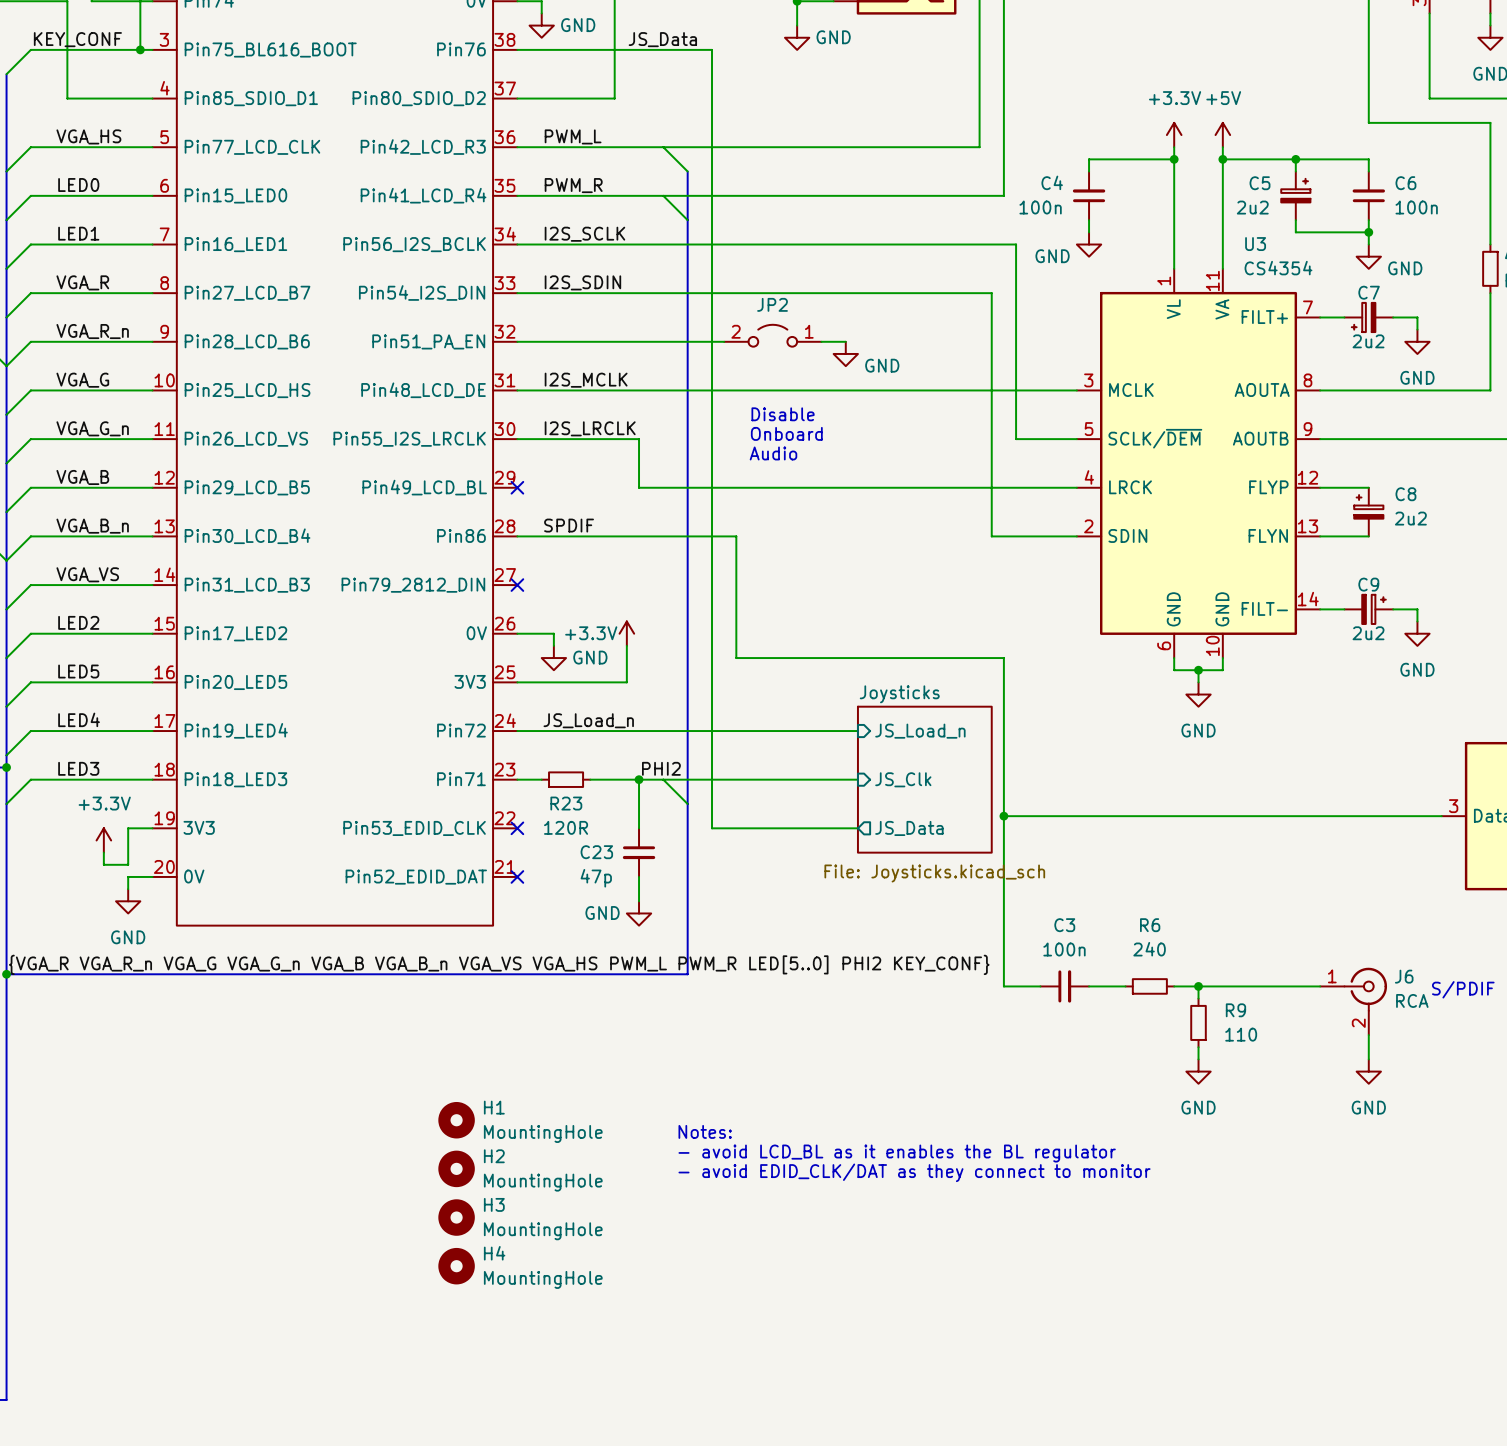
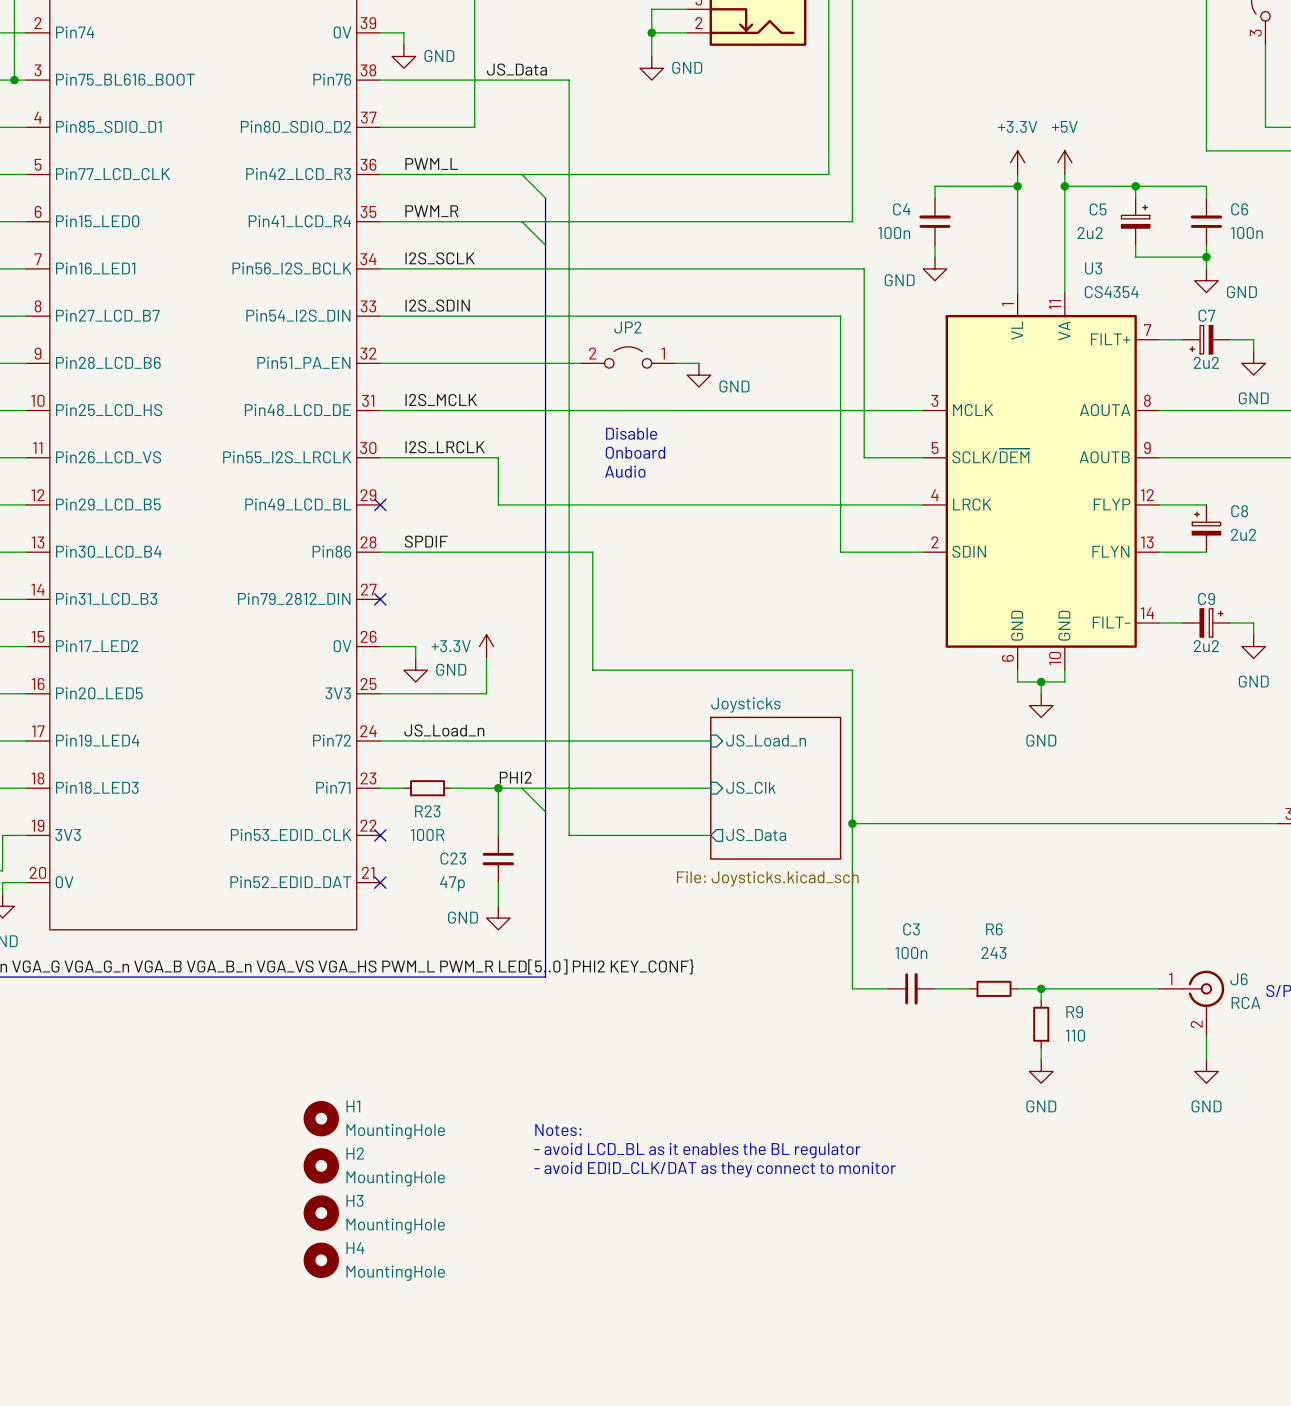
R23 value: 120R (566, 827) -> 100R (427, 834)
R6 value: 240 (1149, 949) -> 243 (993, 953)

